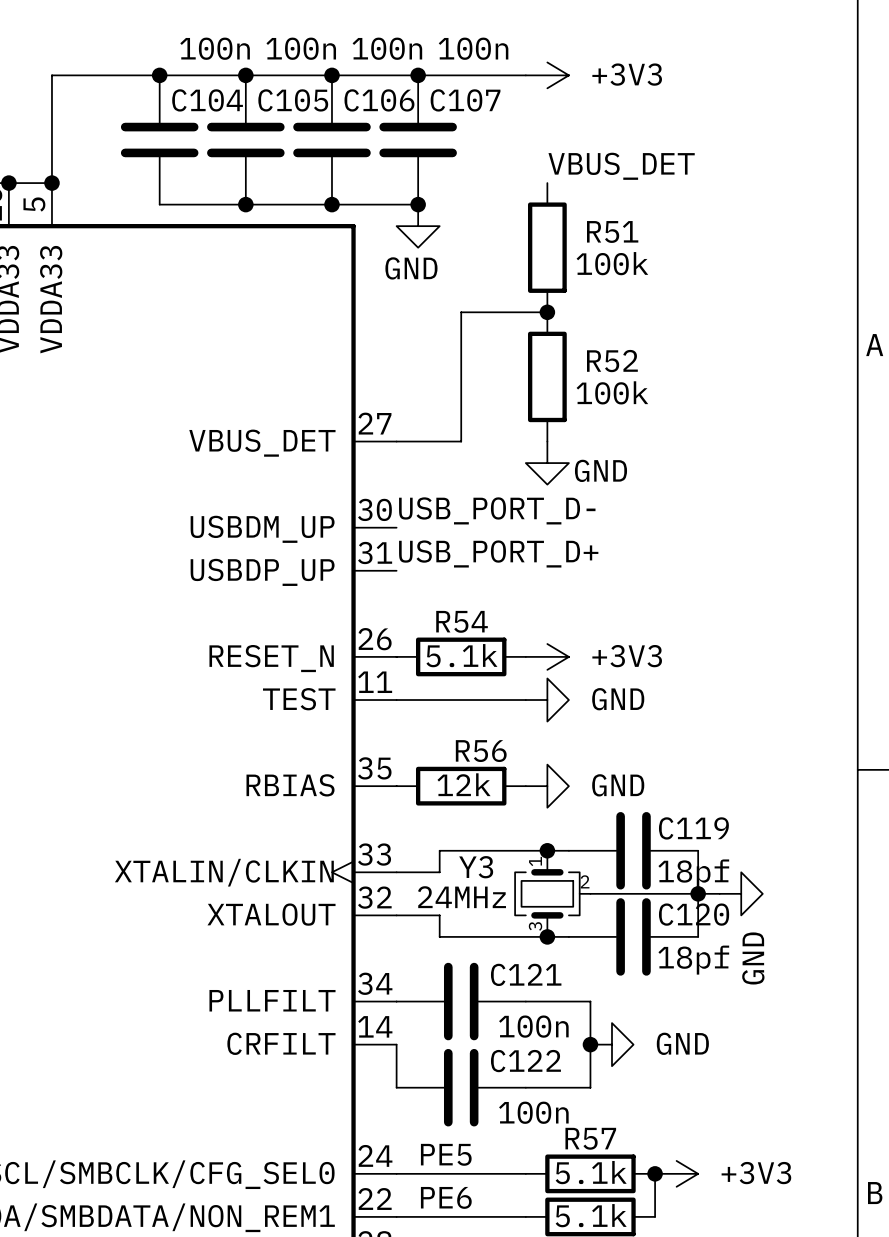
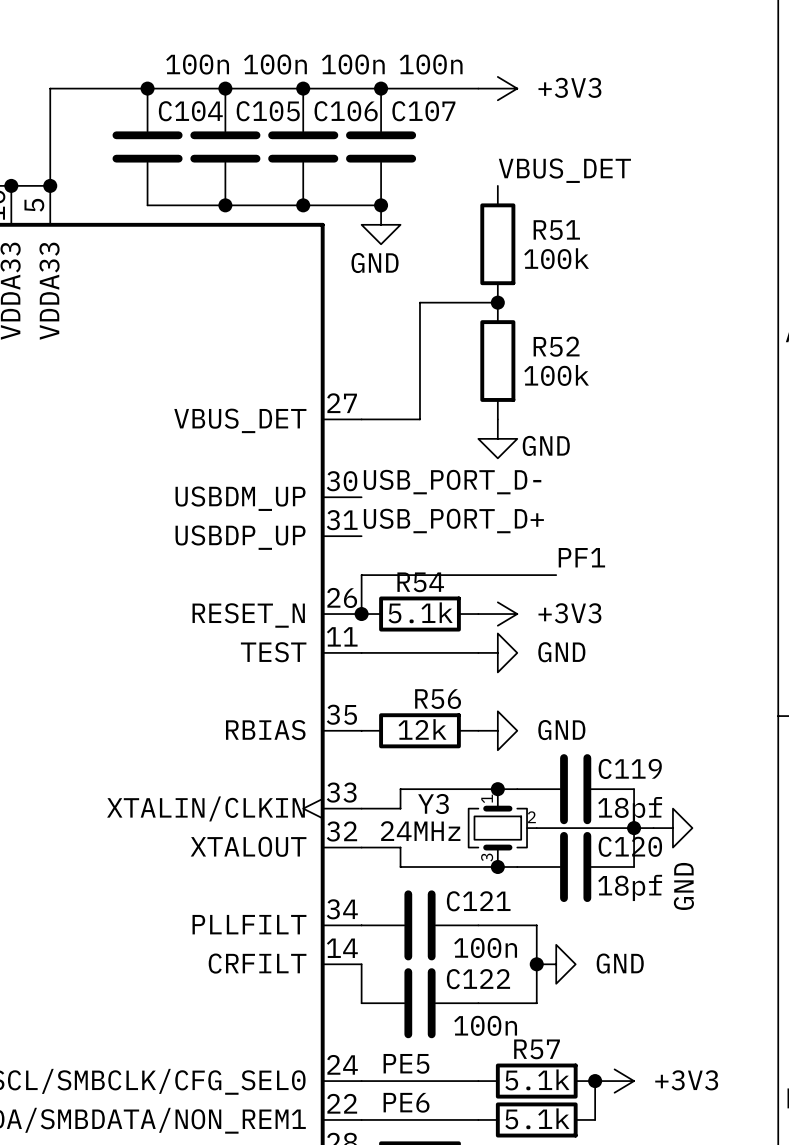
label: none -> PF1 (581, 557)
wire: none -> (556, 575) (361, 575) (361, 614)
junction: none -> (361, 614)

